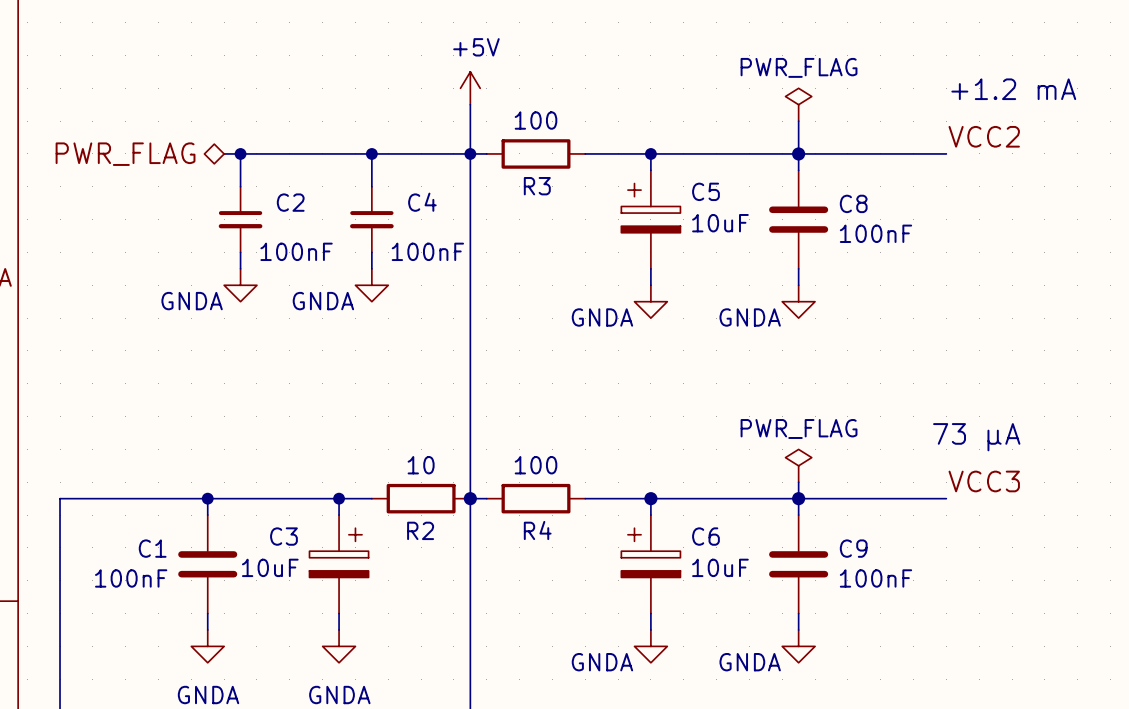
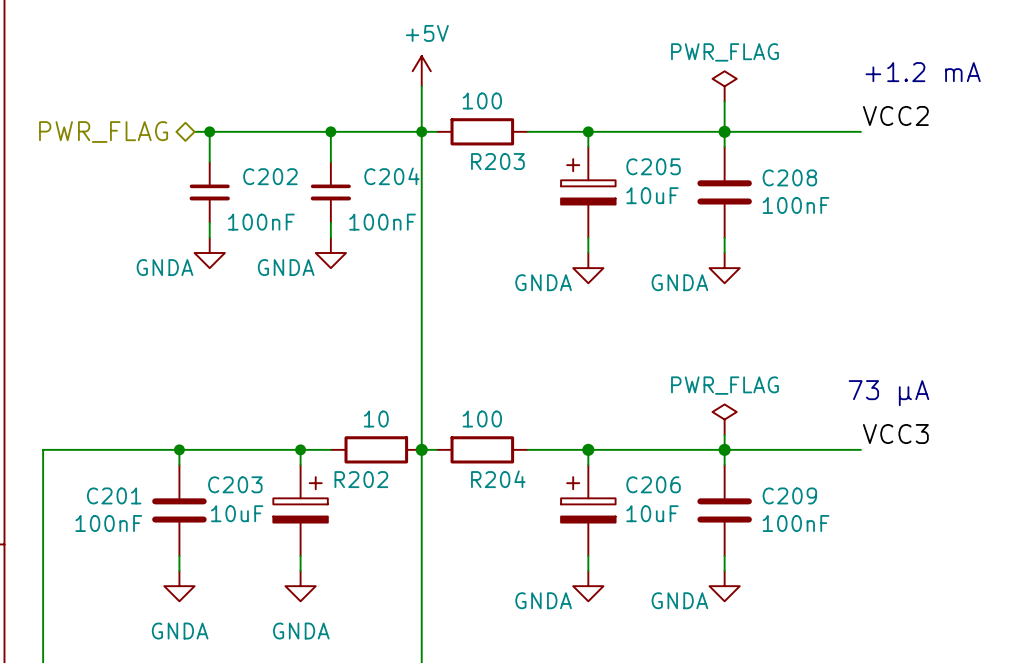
R3 name: R3 (537, 186) -> R203 (497, 161)
C5 name: C5 (705, 191) -> C205 (653, 166)
C2 name: C2 (290, 202) -> C202 (270, 176)
C4 name: C4 (422, 202) -> C204 (391, 176)
C8 name: C8 (853, 203) -> C208 (789, 177)
R2 name: R2 (420, 530) -> R202 (361, 479)
R4 name: R4 (537, 530) -> R204 (498, 479)
C3 name: C3 (283, 536) -> C203 (235, 484)
C6 name: C6 (705, 536) -> C206 (653, 484)
C1 name: C1 (152, 548) -> C201 (114, 495)
C9 name: C9 (853, 548) -> C209 (789, 495)

